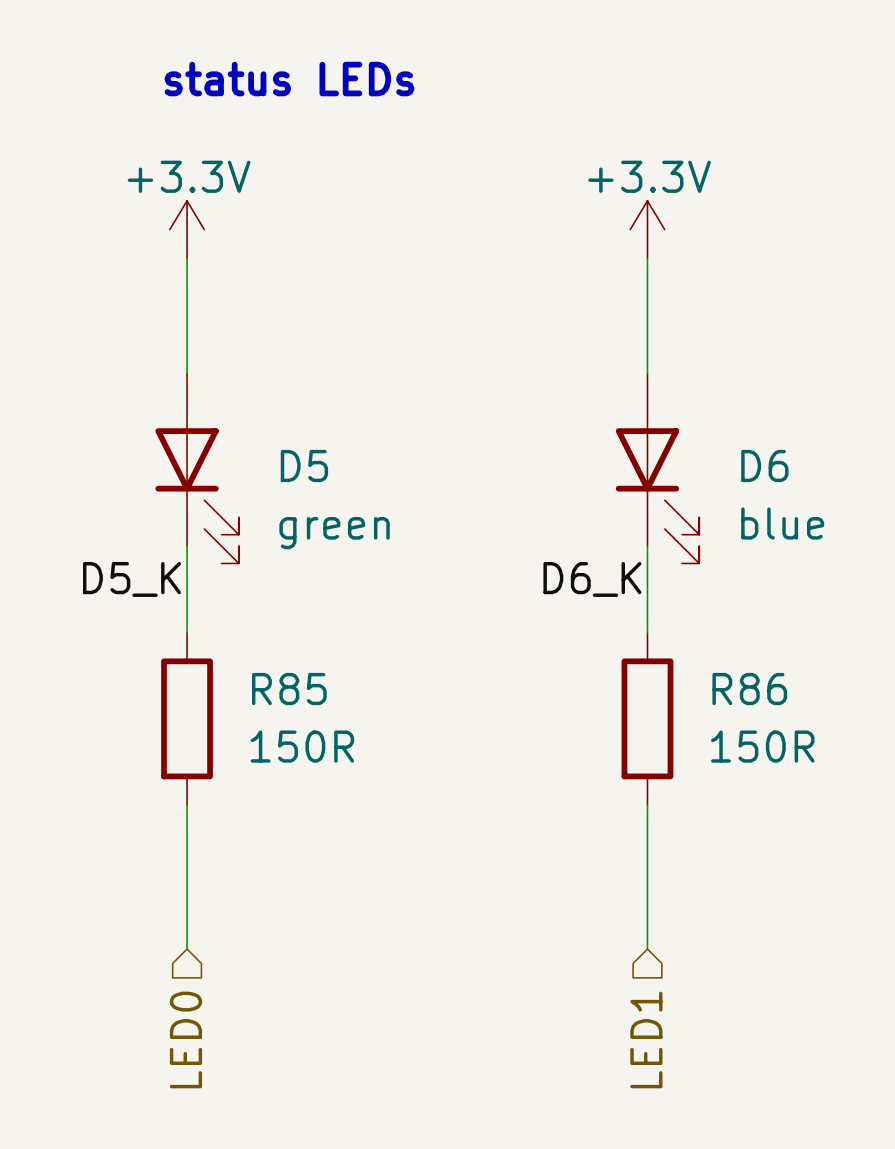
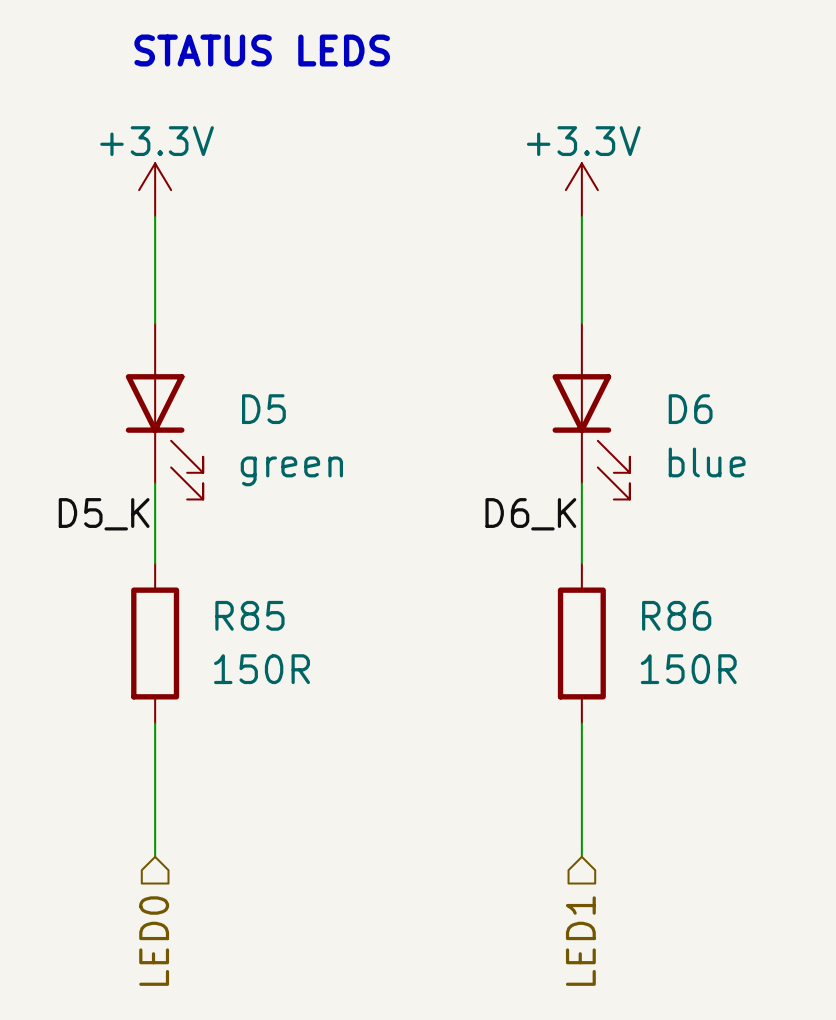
text: status LEDs (289, 79) -> STATUS LEDS (262, 50)

